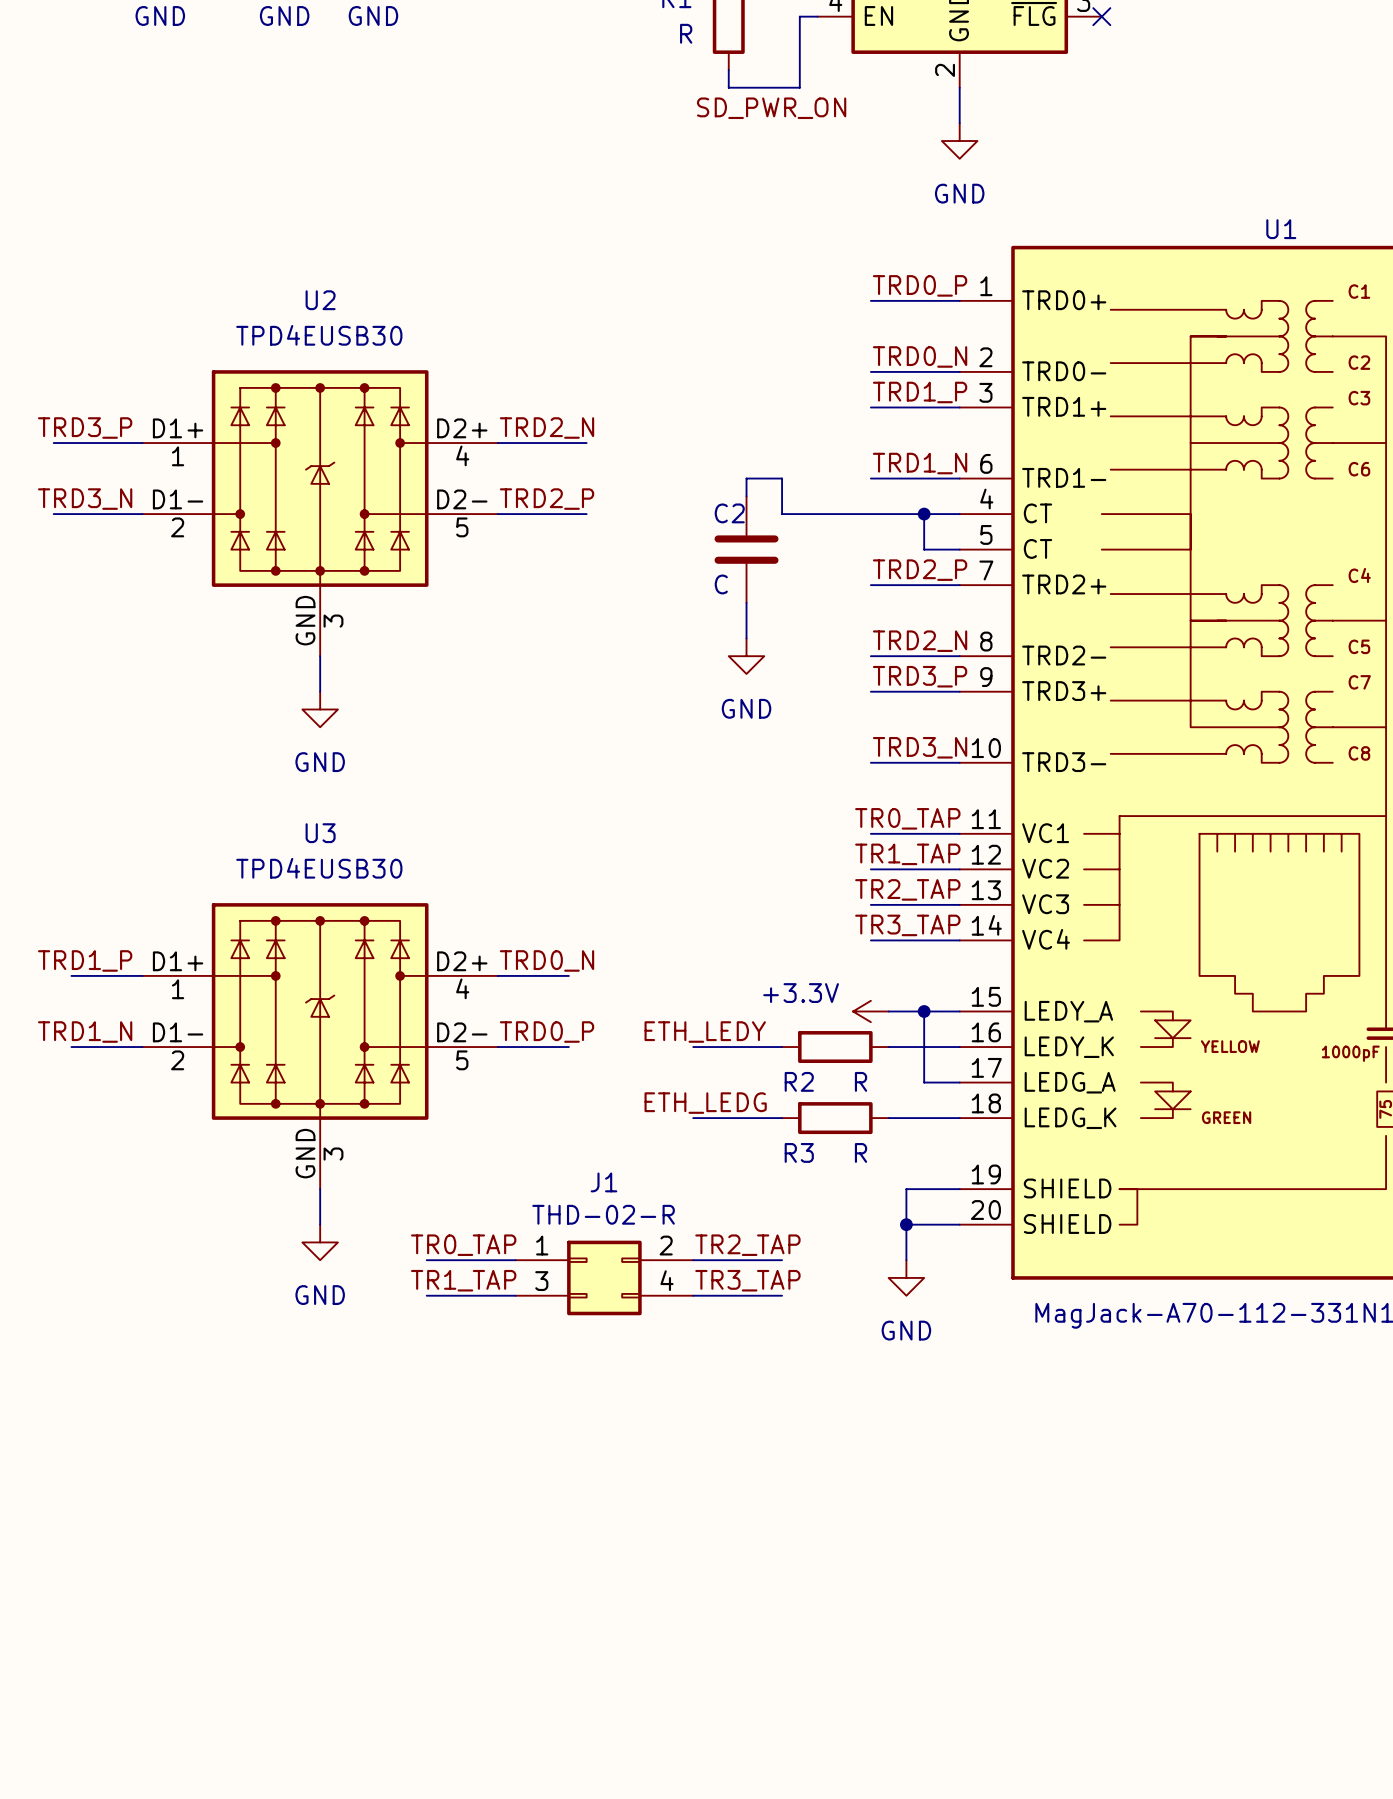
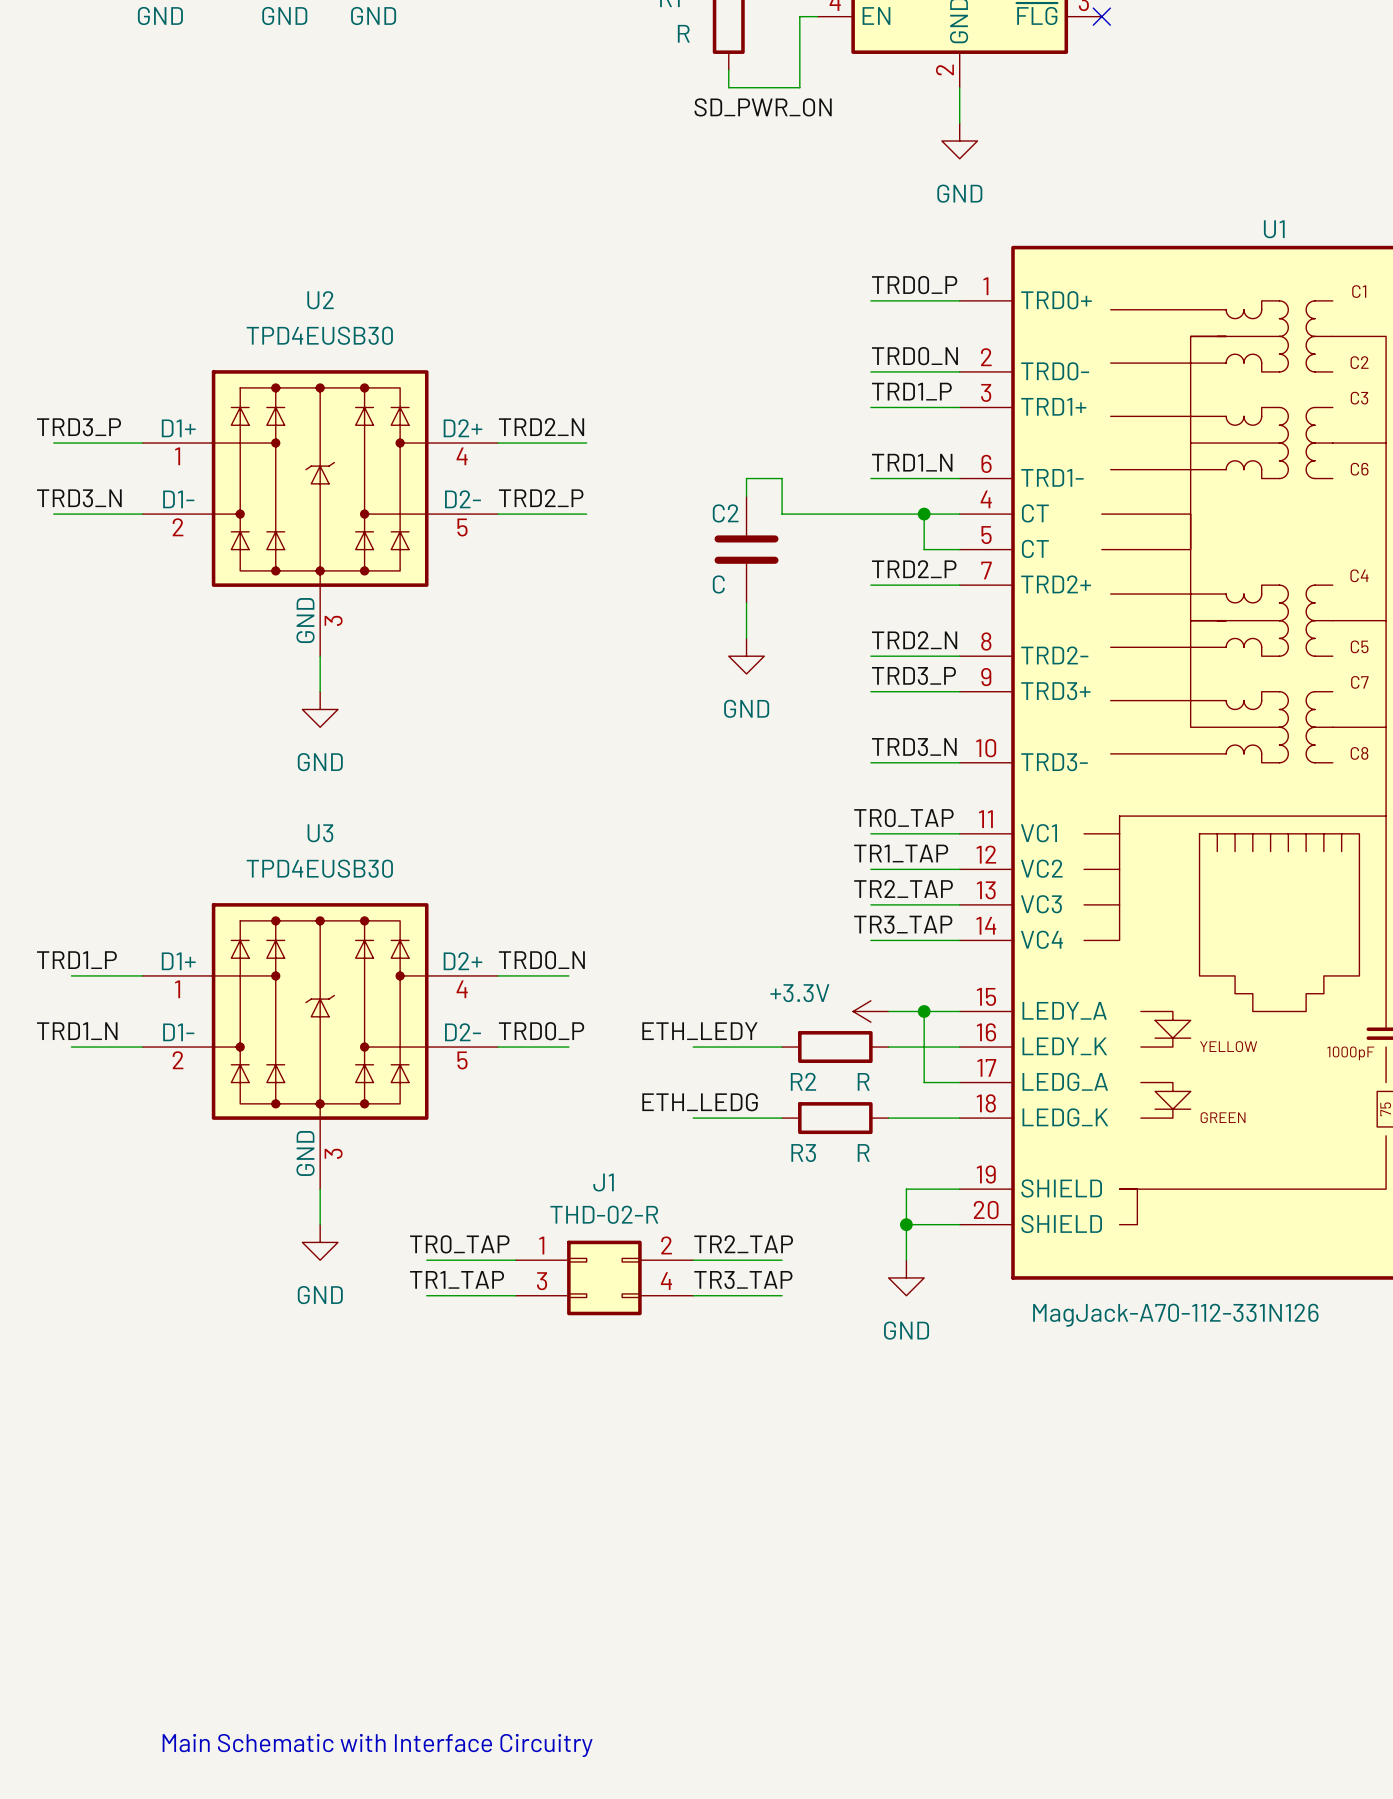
text: none -> Main Schematic with Interface Circuitry (377, 1745)

